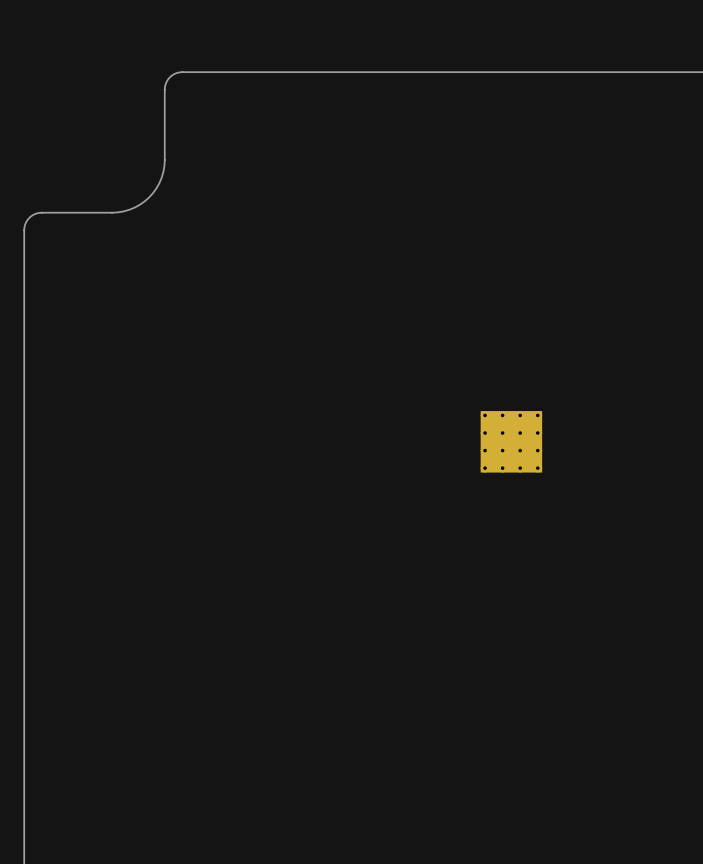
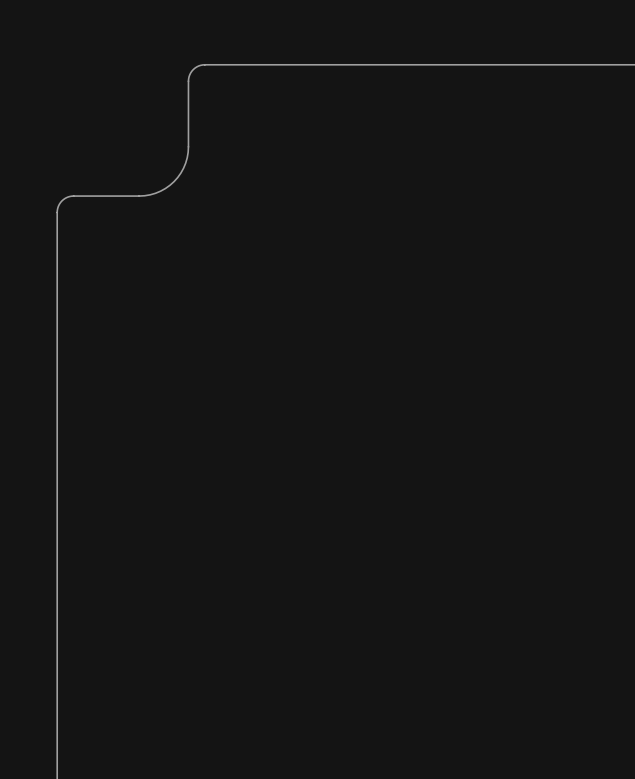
part: (511, 441) -> none

